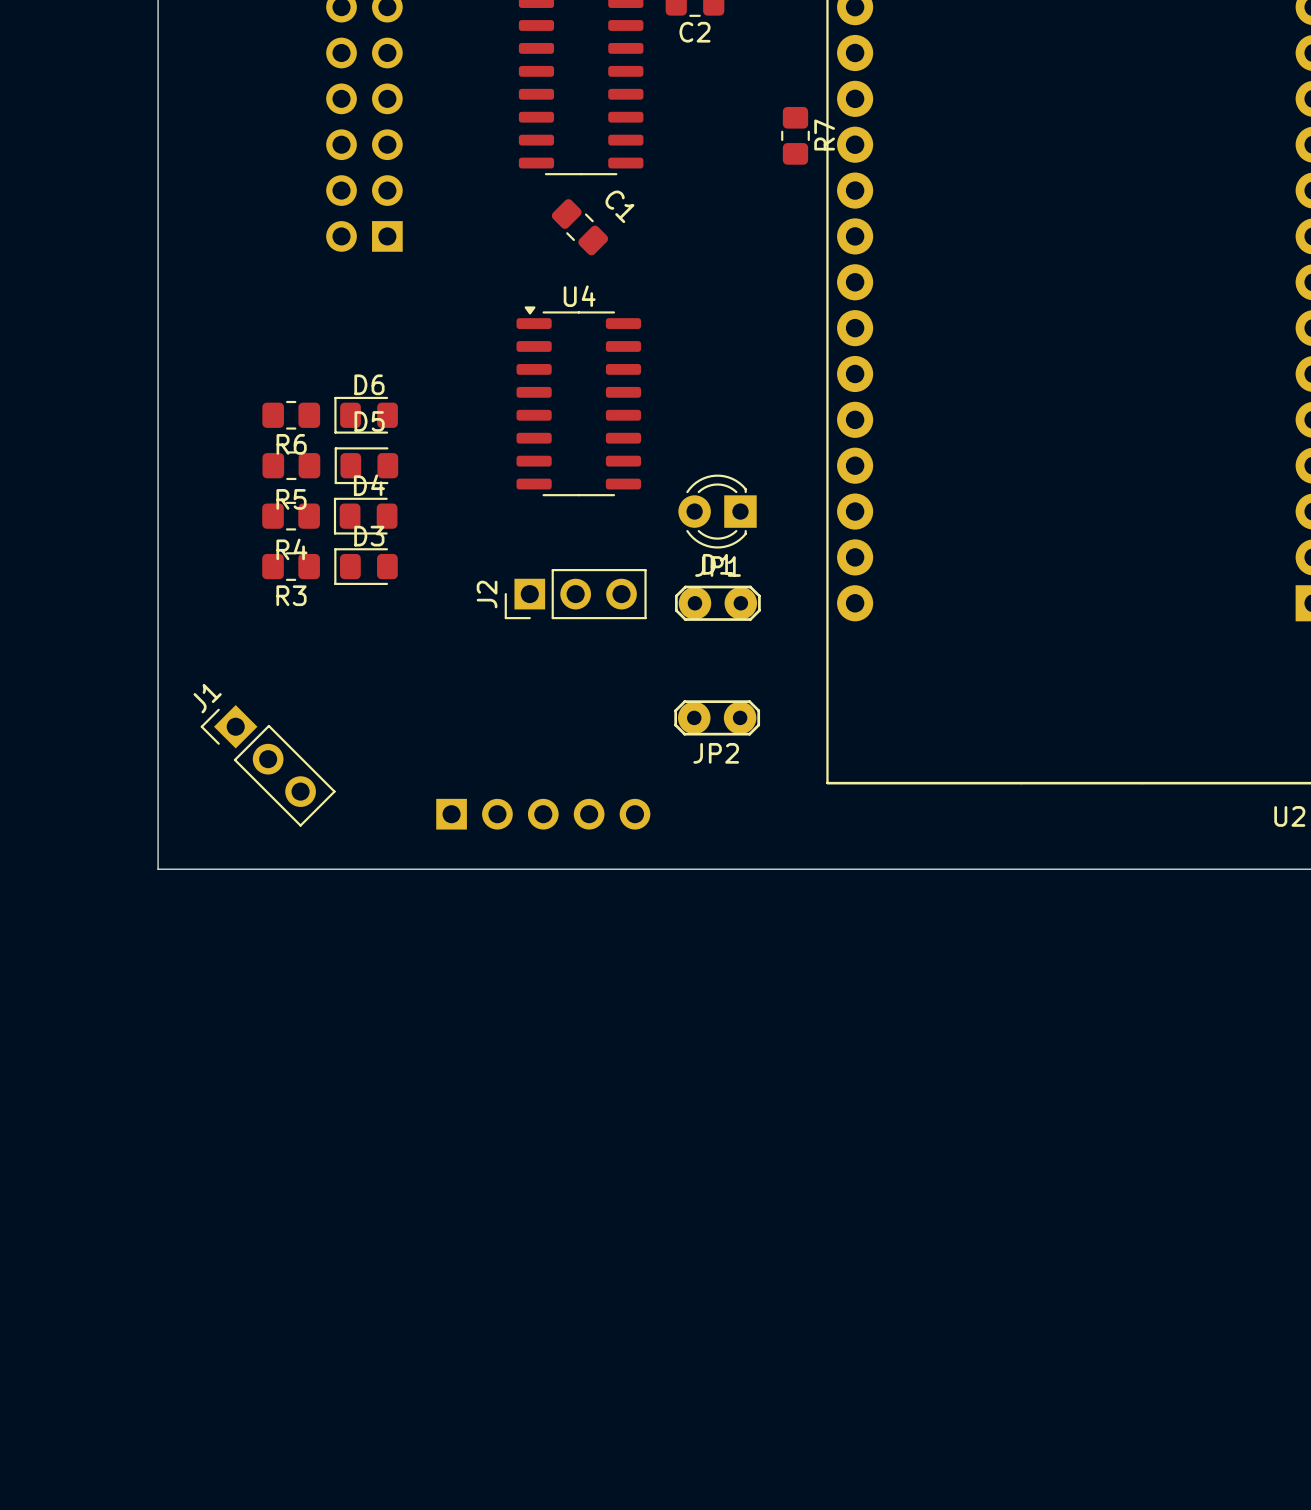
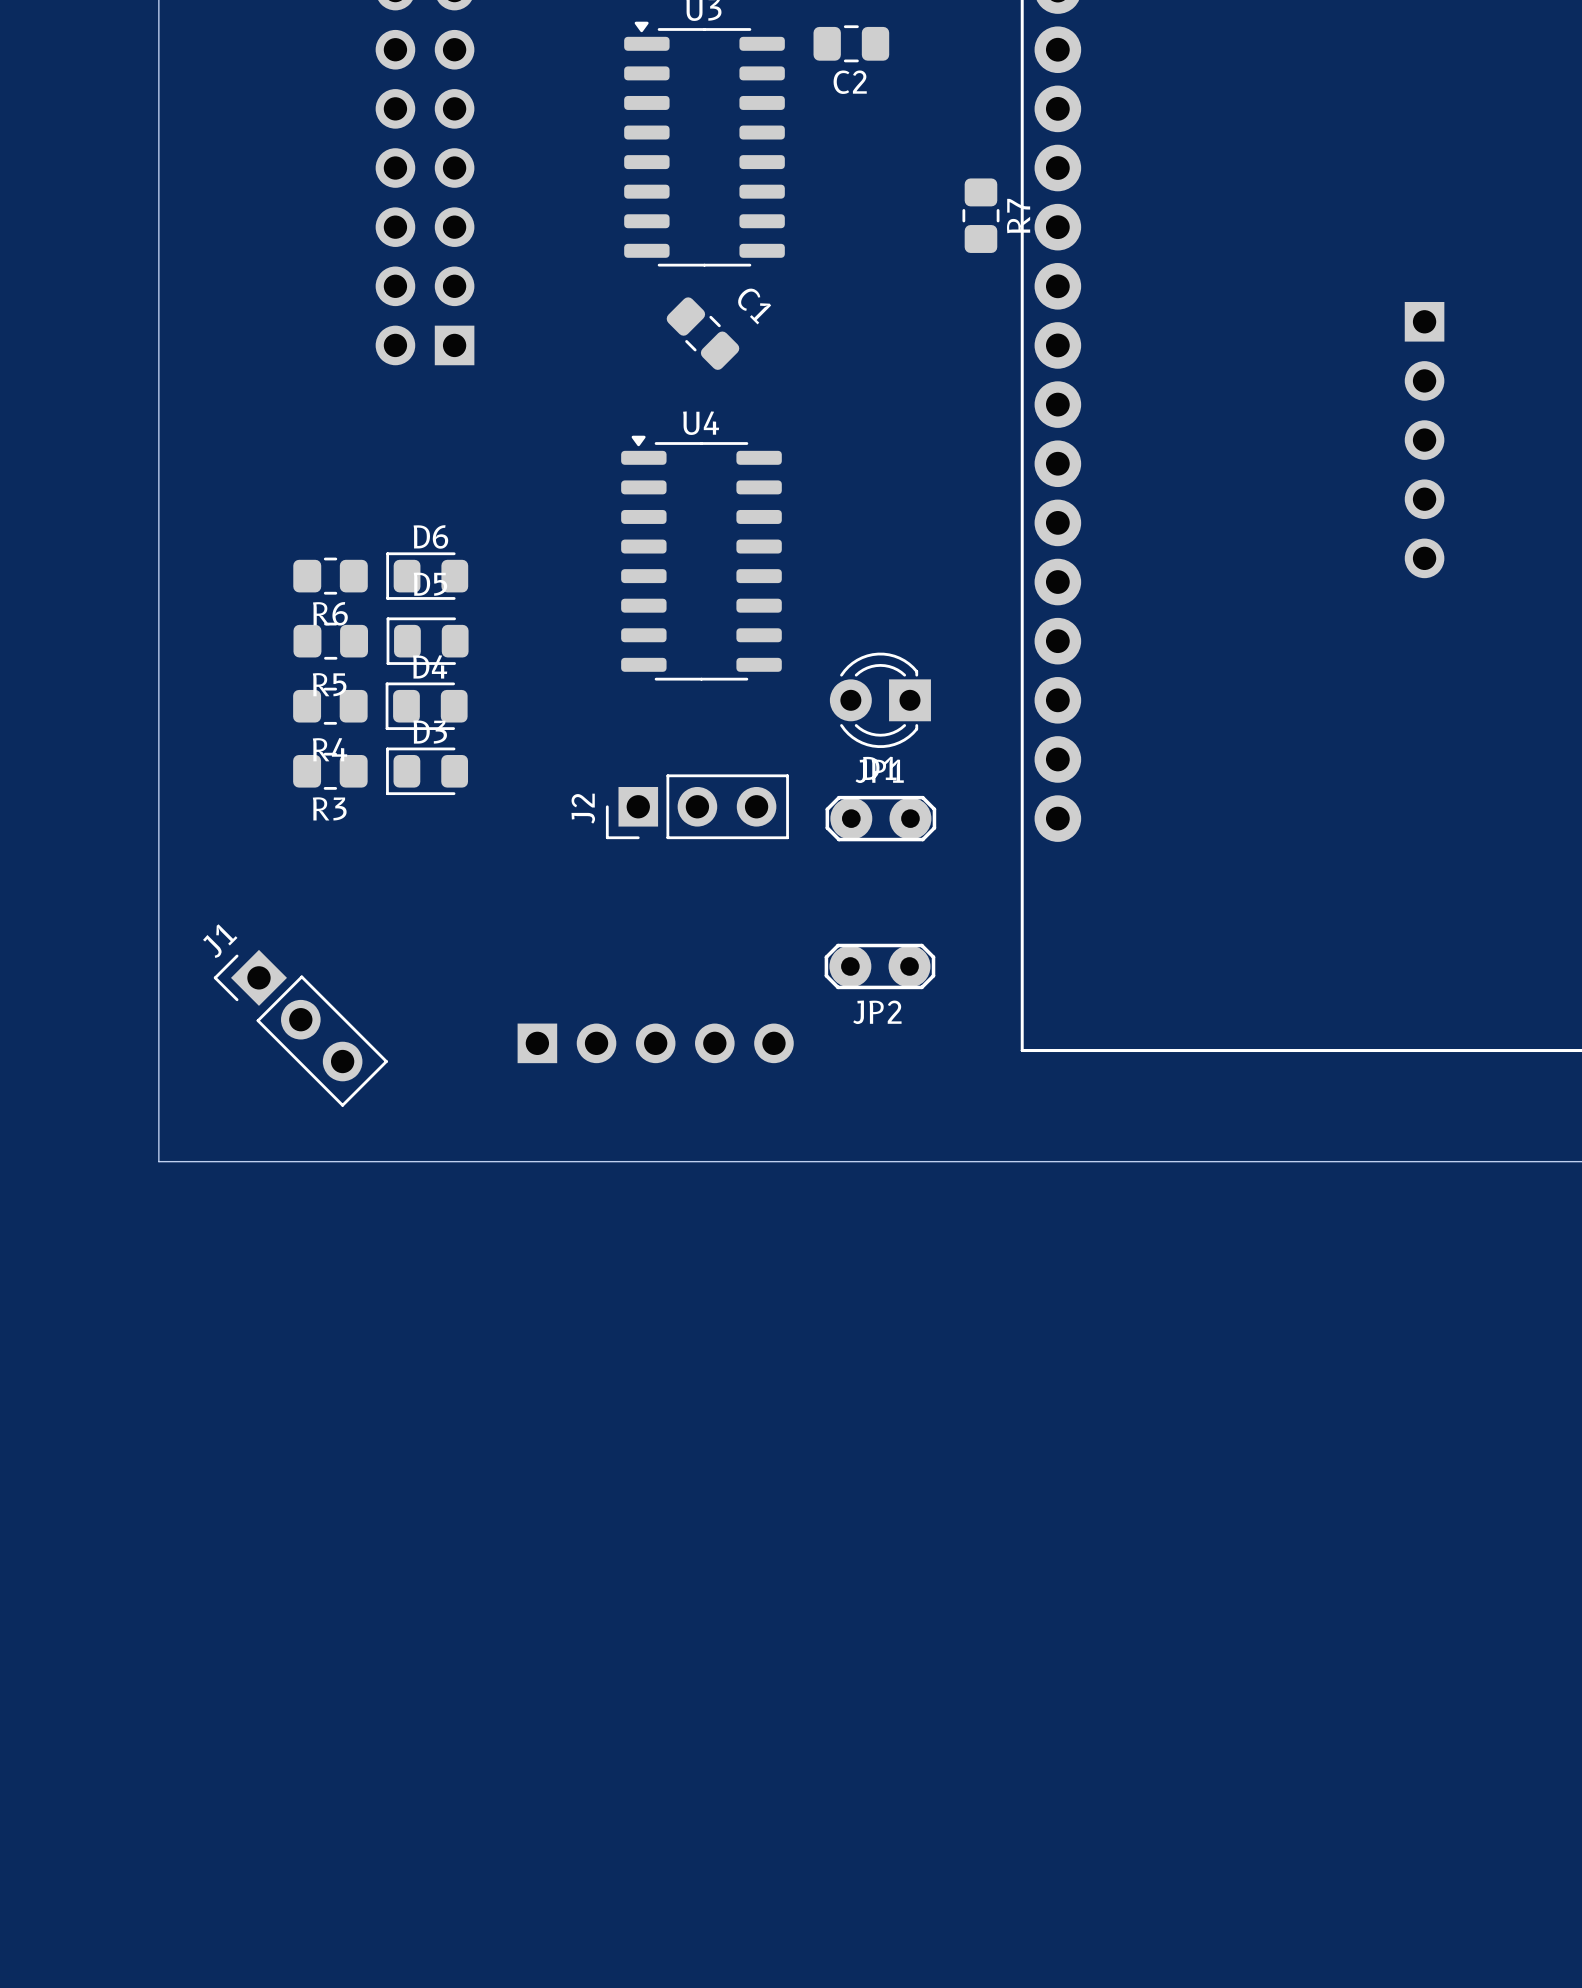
part: none -> (1424, 440)
part position: (543, 814) -> (655, 1043)

